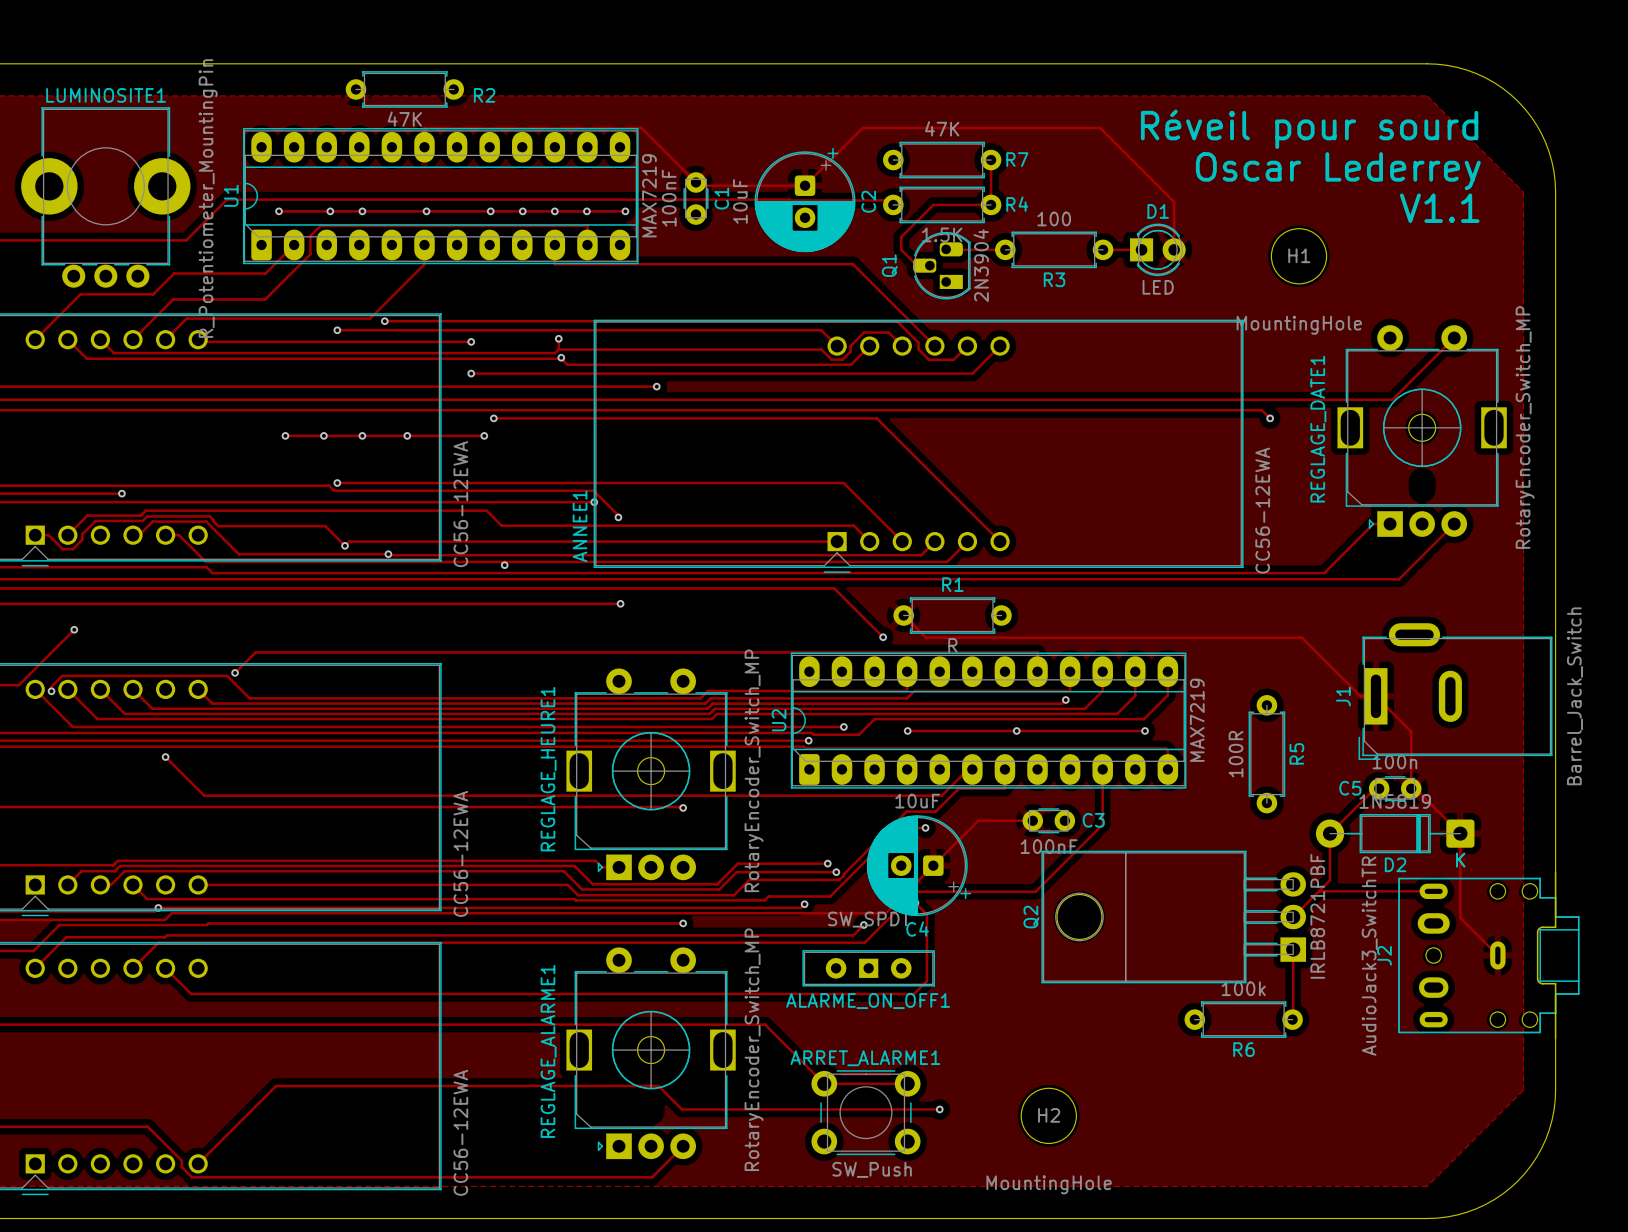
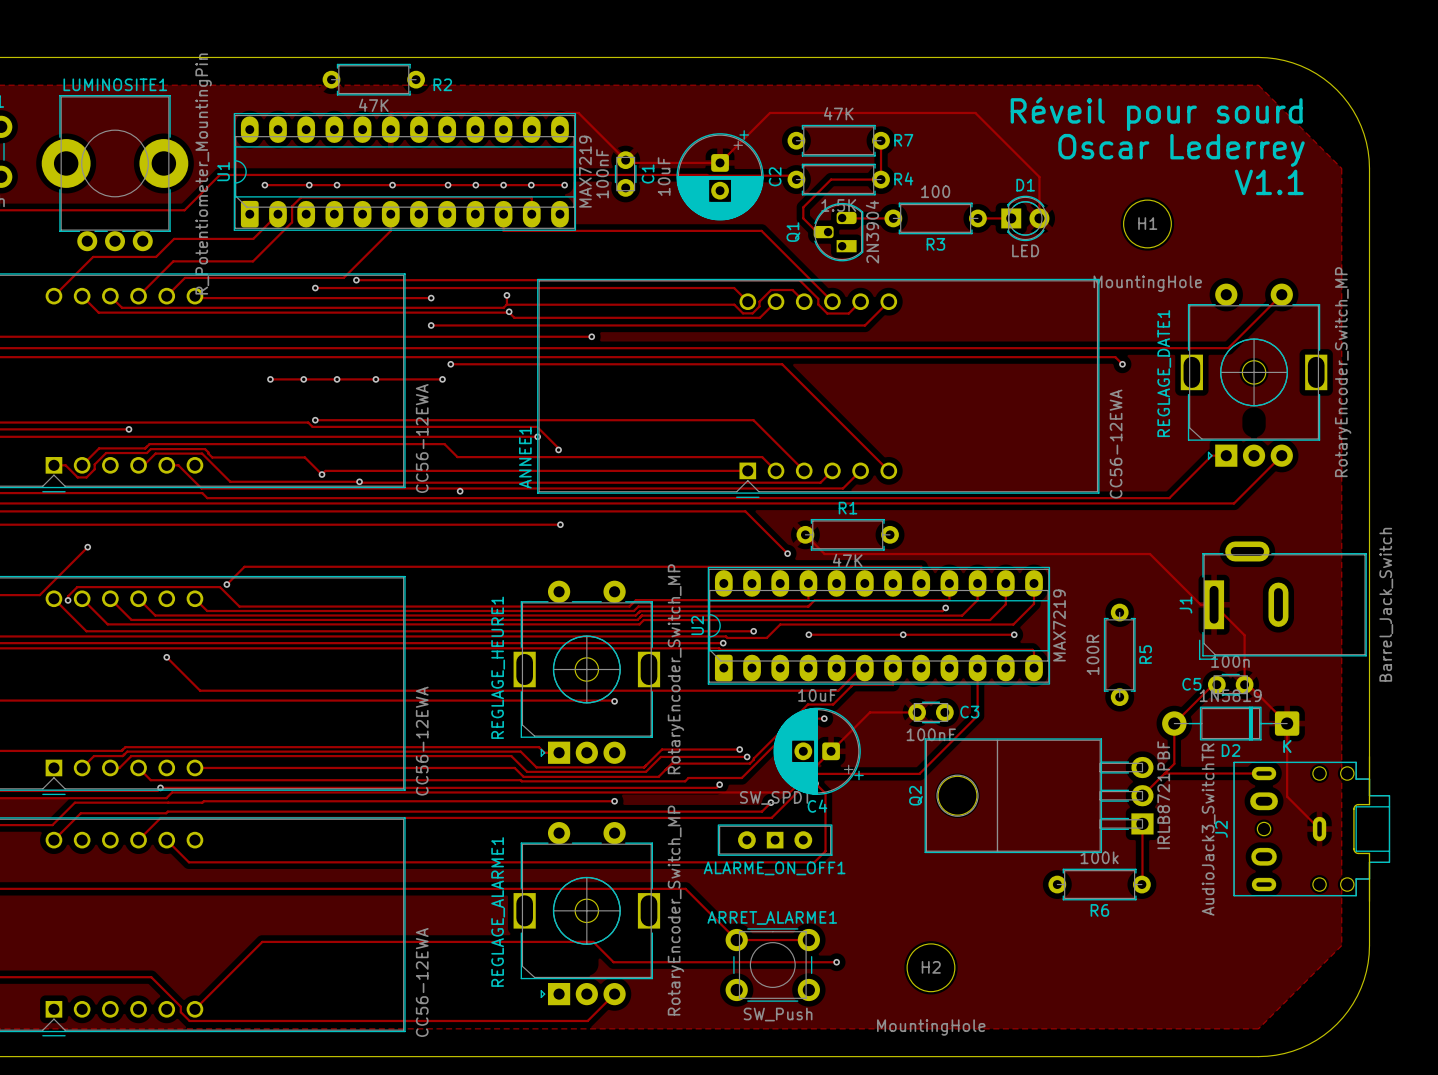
R1 value: R (952, 645) -> 47K (847, 560)

